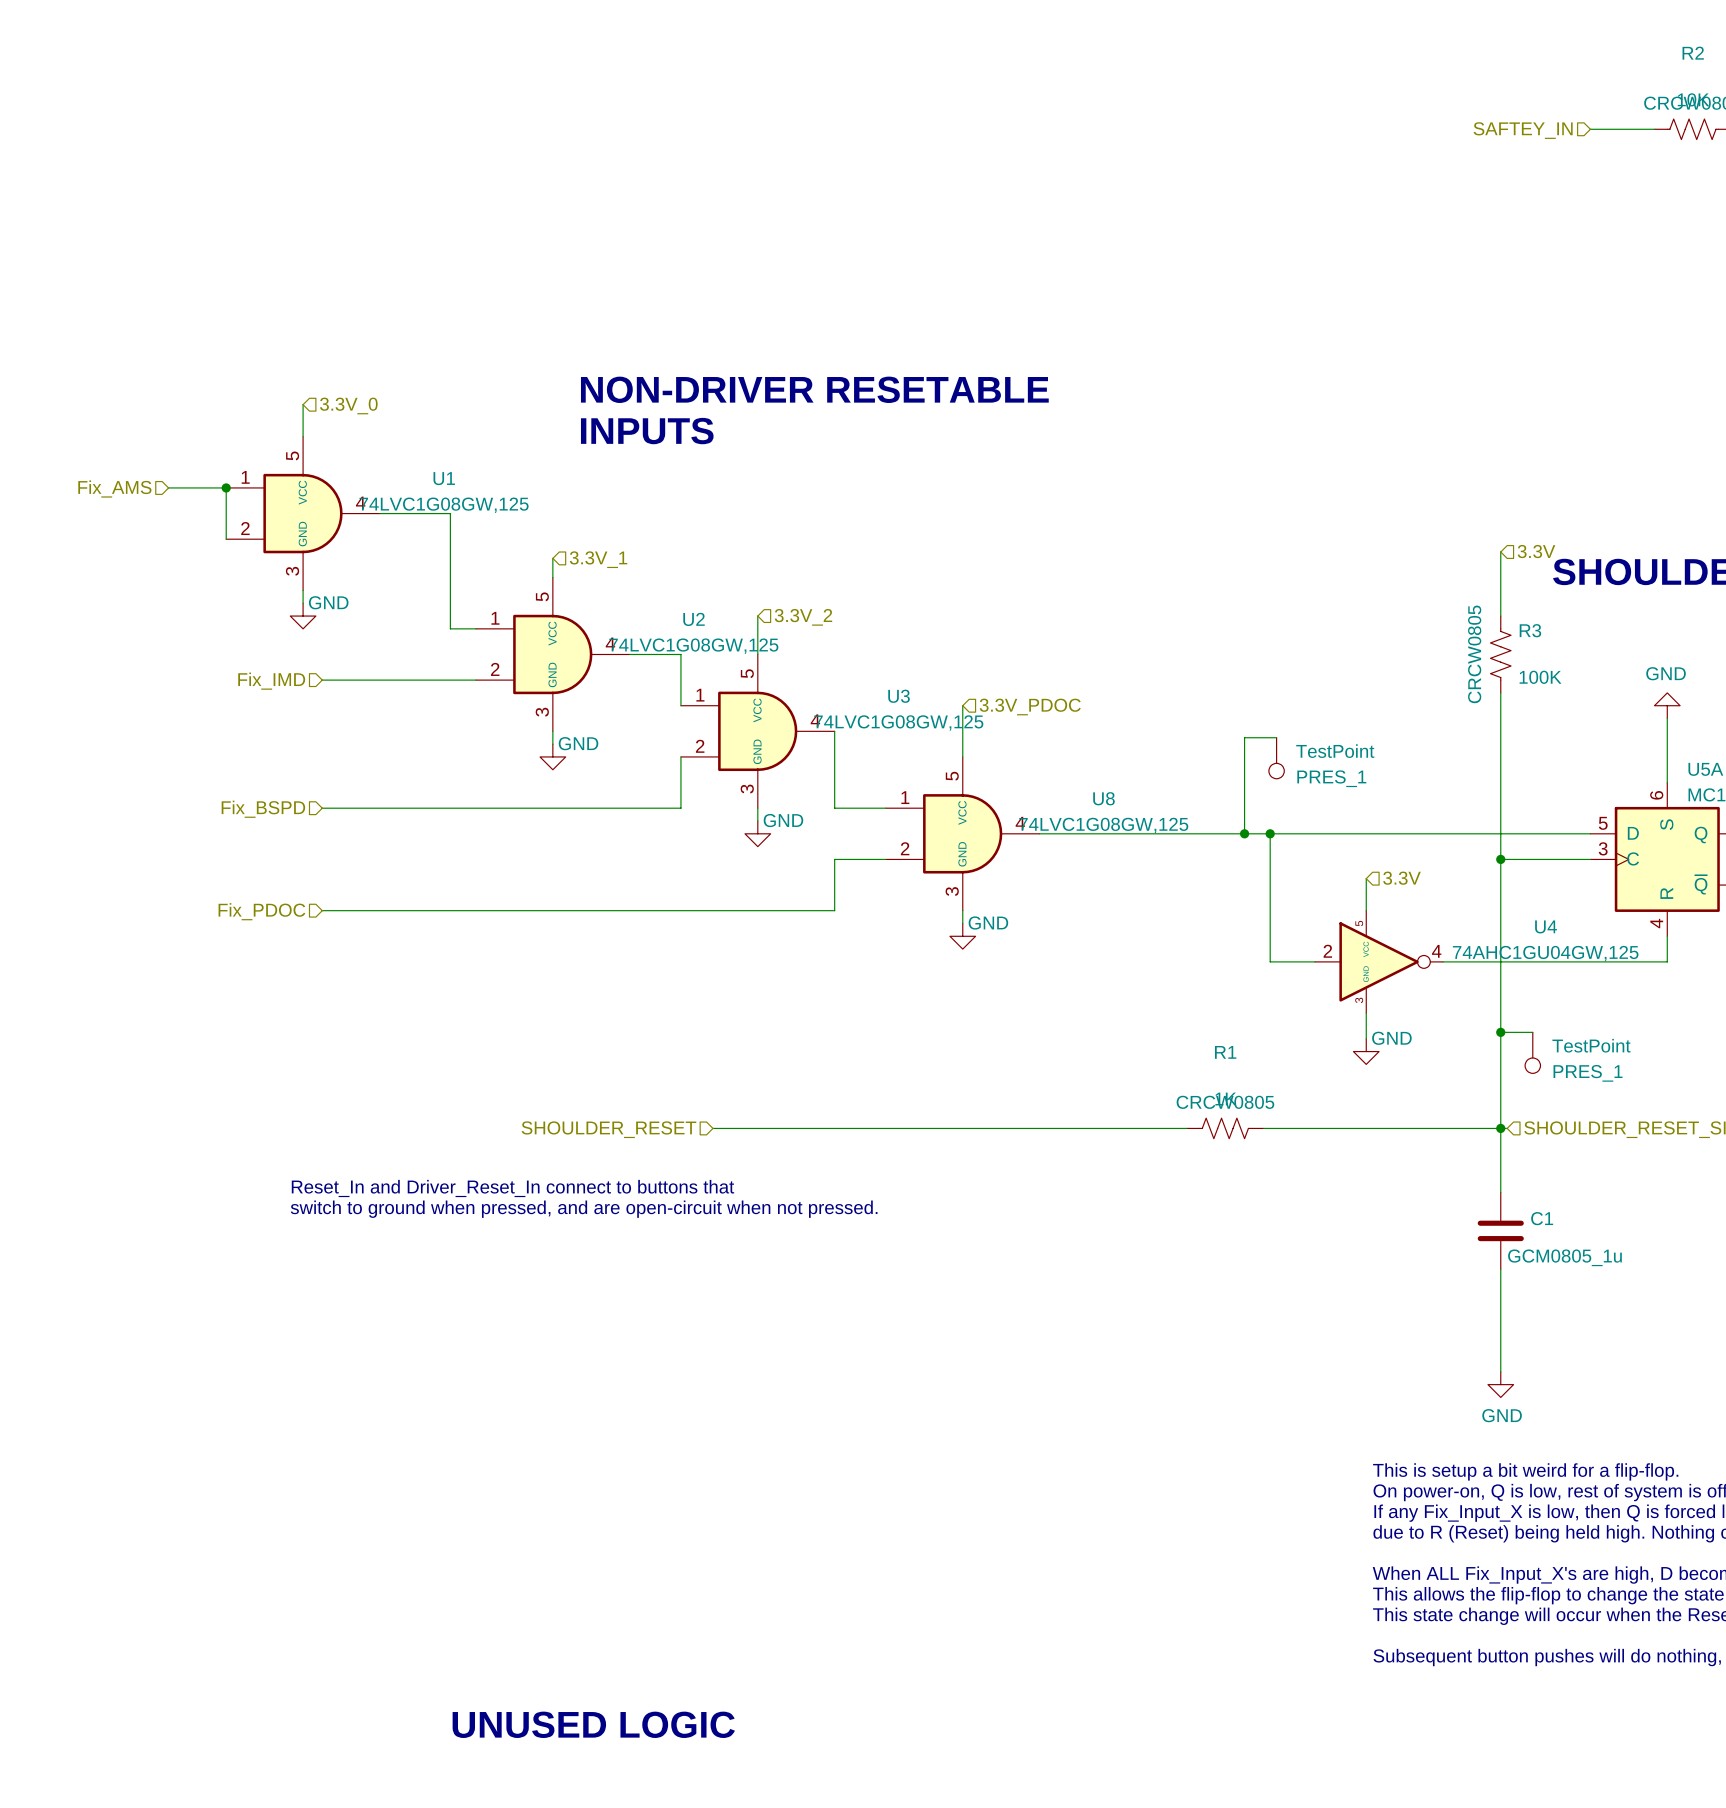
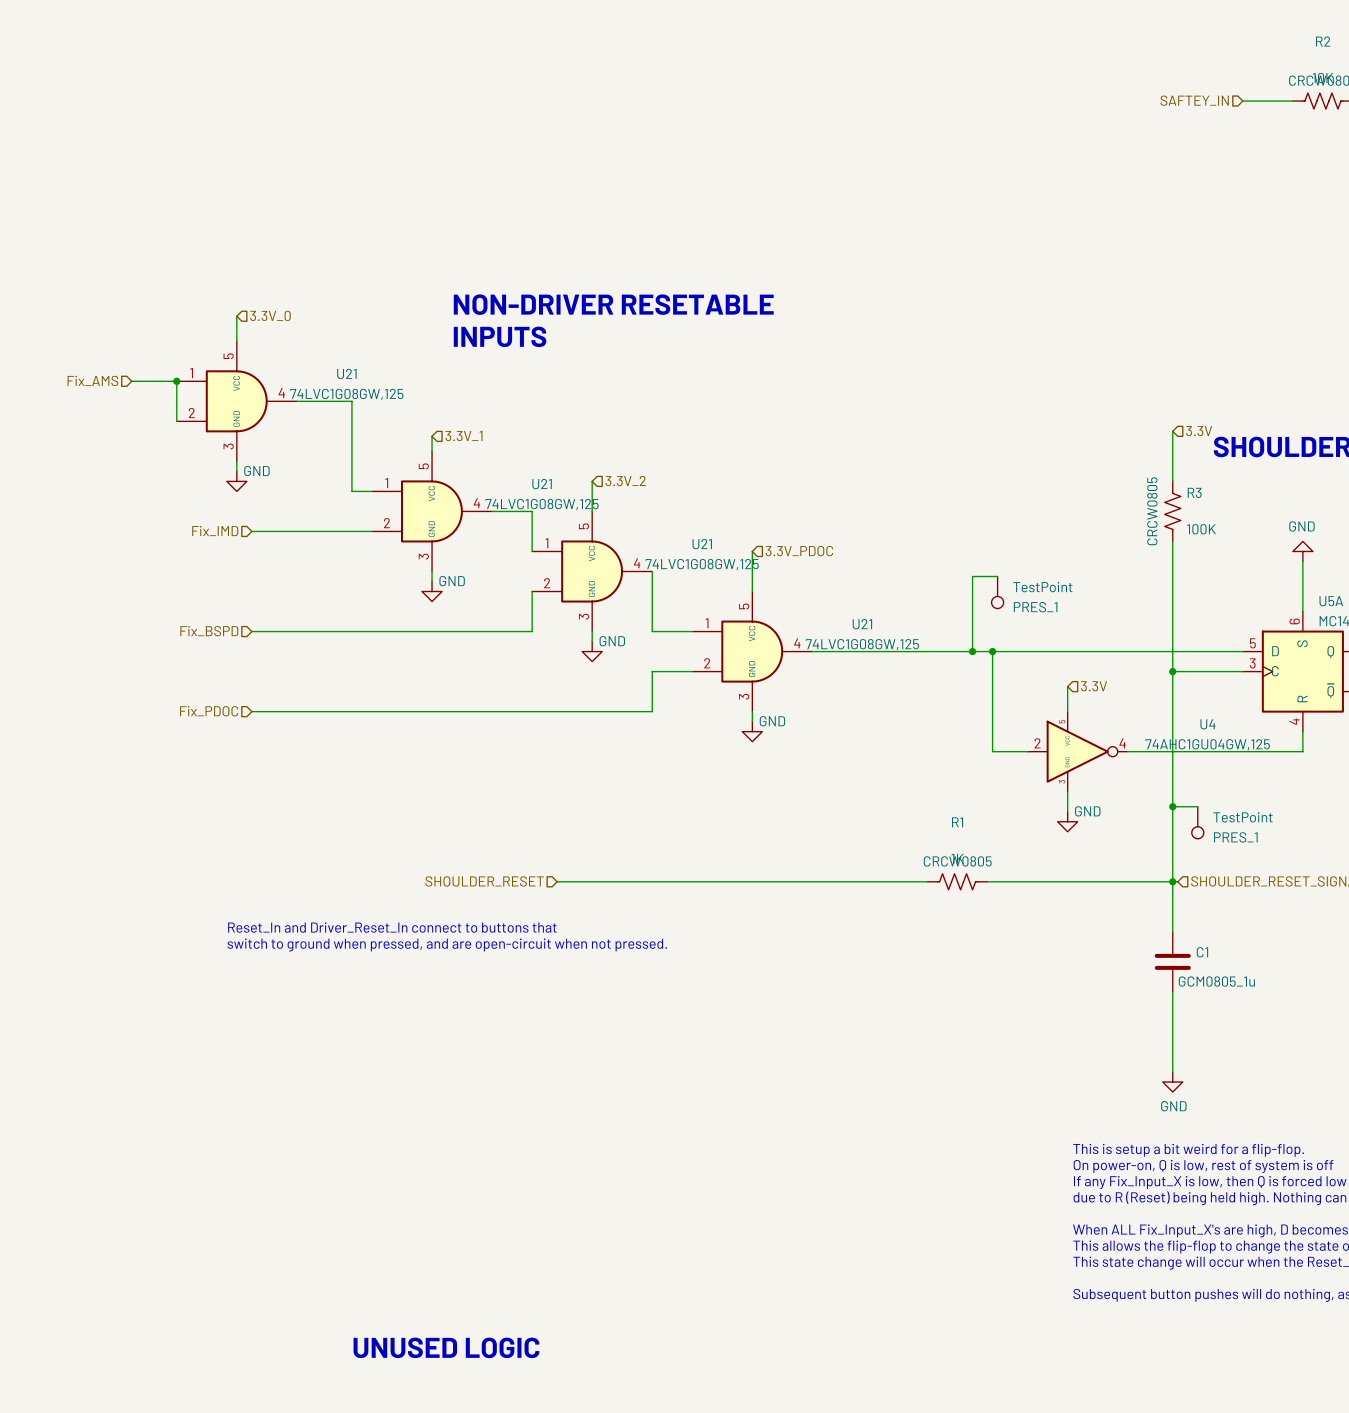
U1 name: U1 (444, 478) -> U21 (346, 373)
U2 name: U2 (694, 619) -> U21 (542, 484)
U3 name: U3 (899, 696) -> U21 (702, 544)
U8 name: U8 (1103, 798) -> U21 (862, 624)

